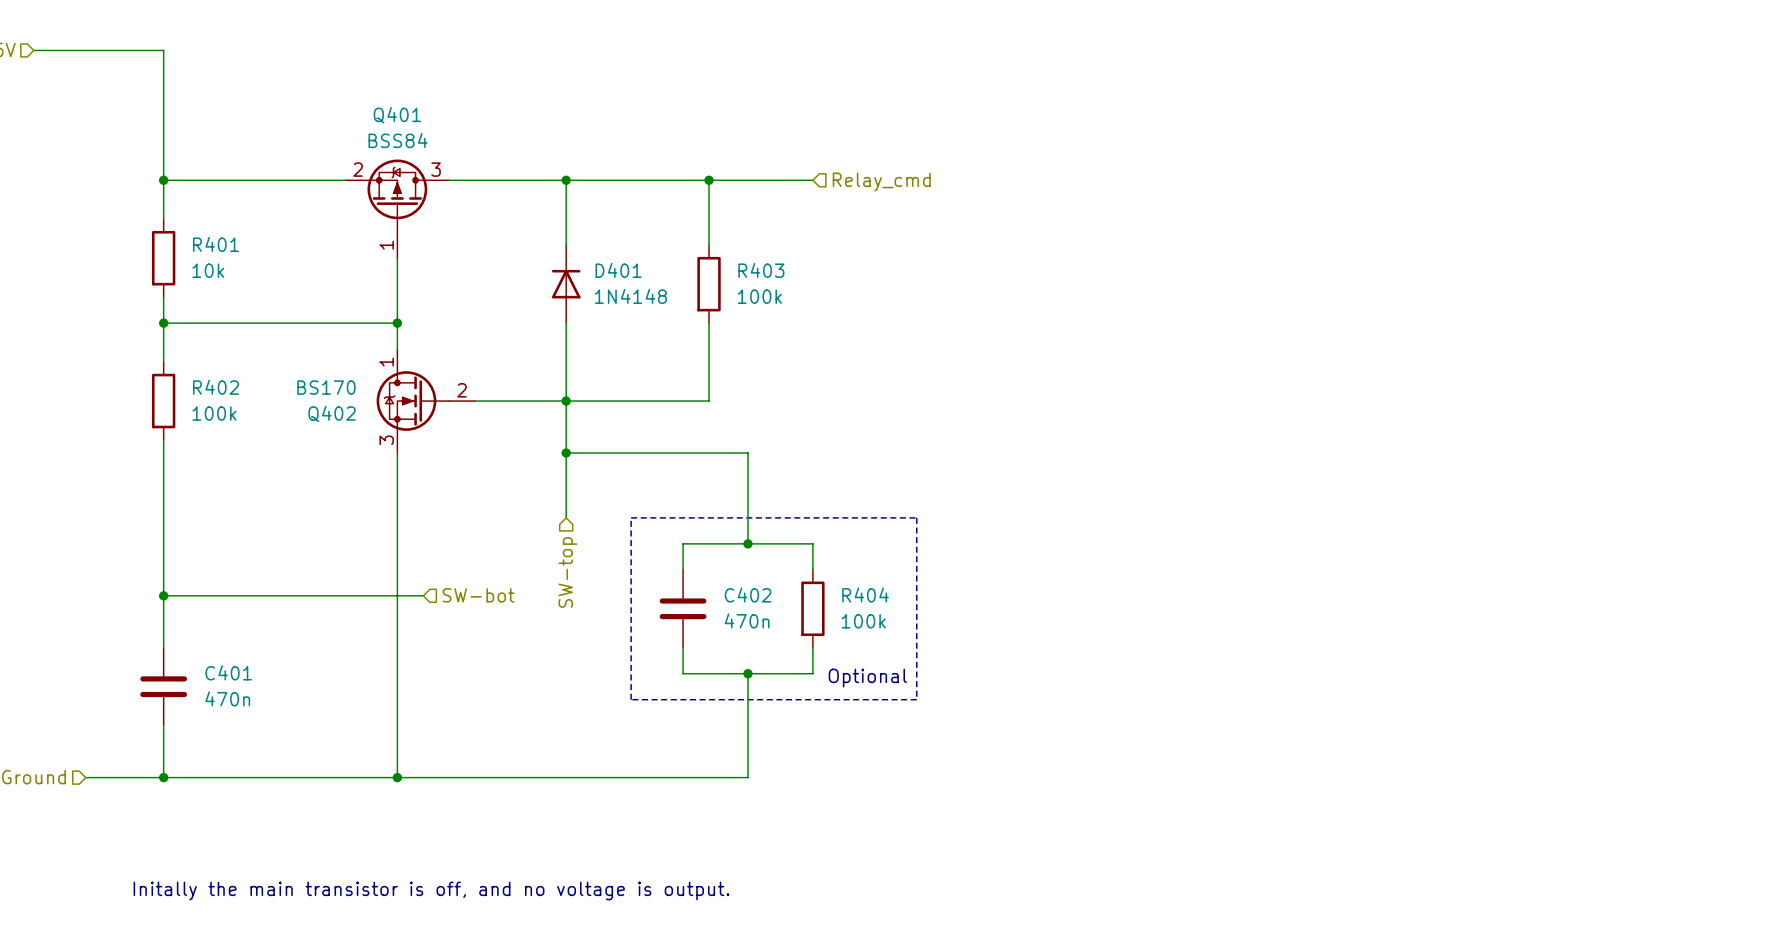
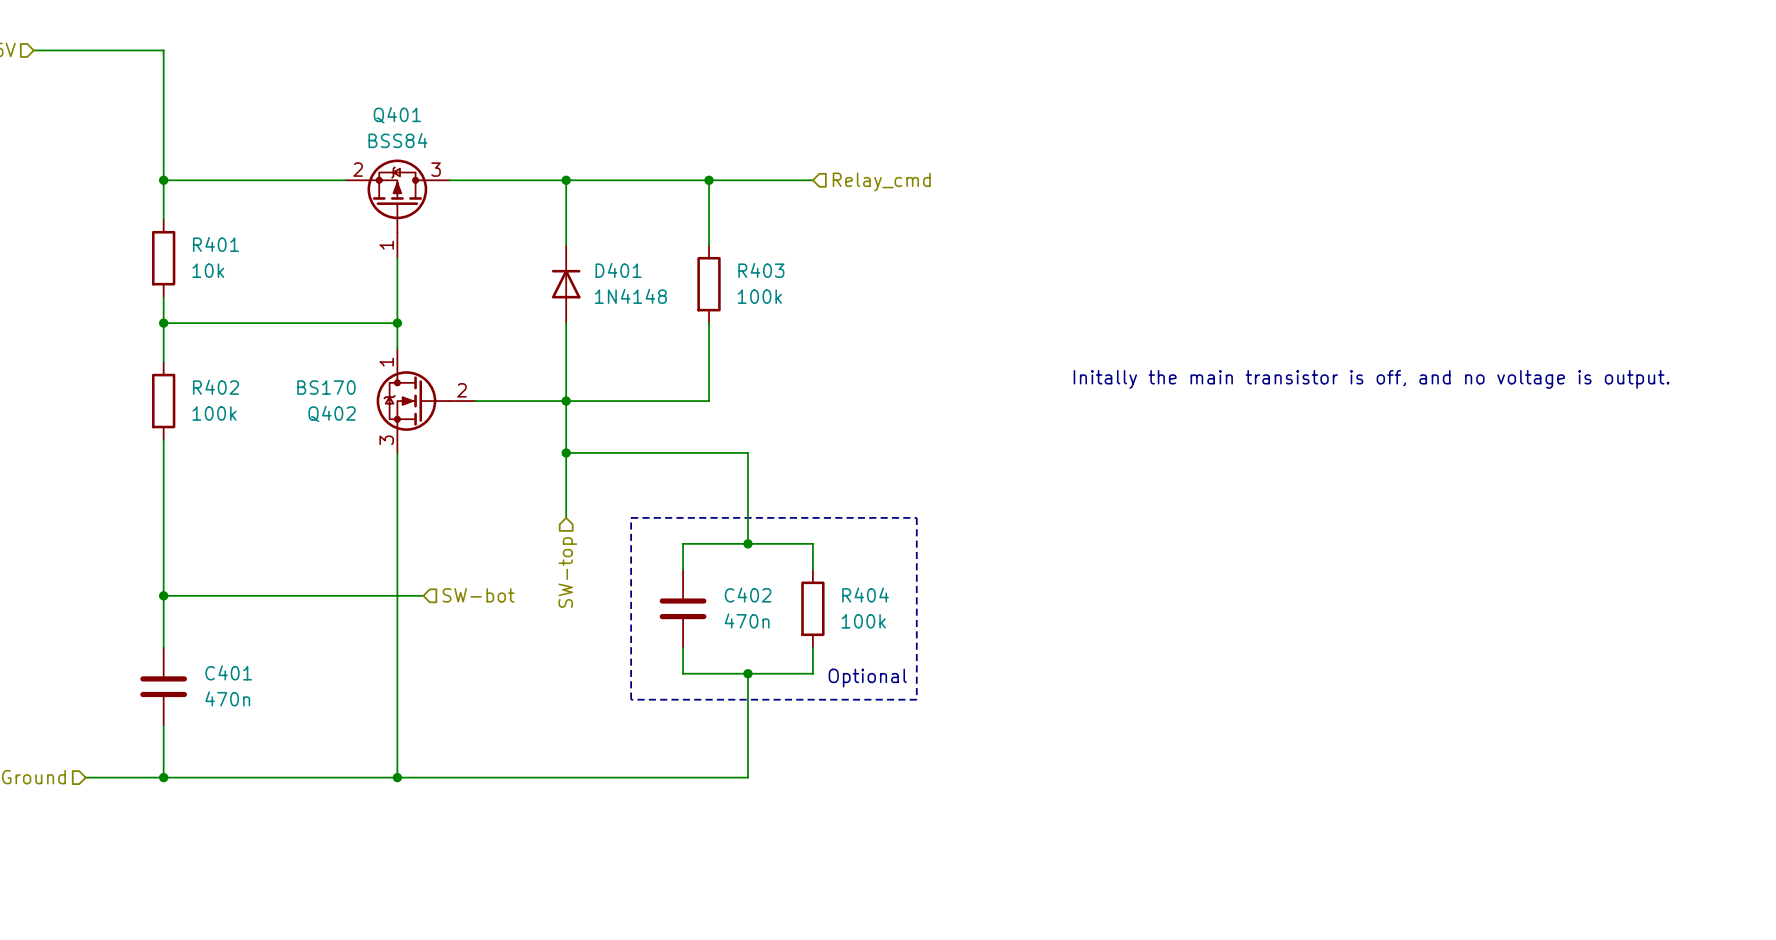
text: none -> Initally the main transistor is off, and no voltage is output. (1371, 379)
text: Initally the main transistor is off, and no voltage is output. (431, 890) -> none

